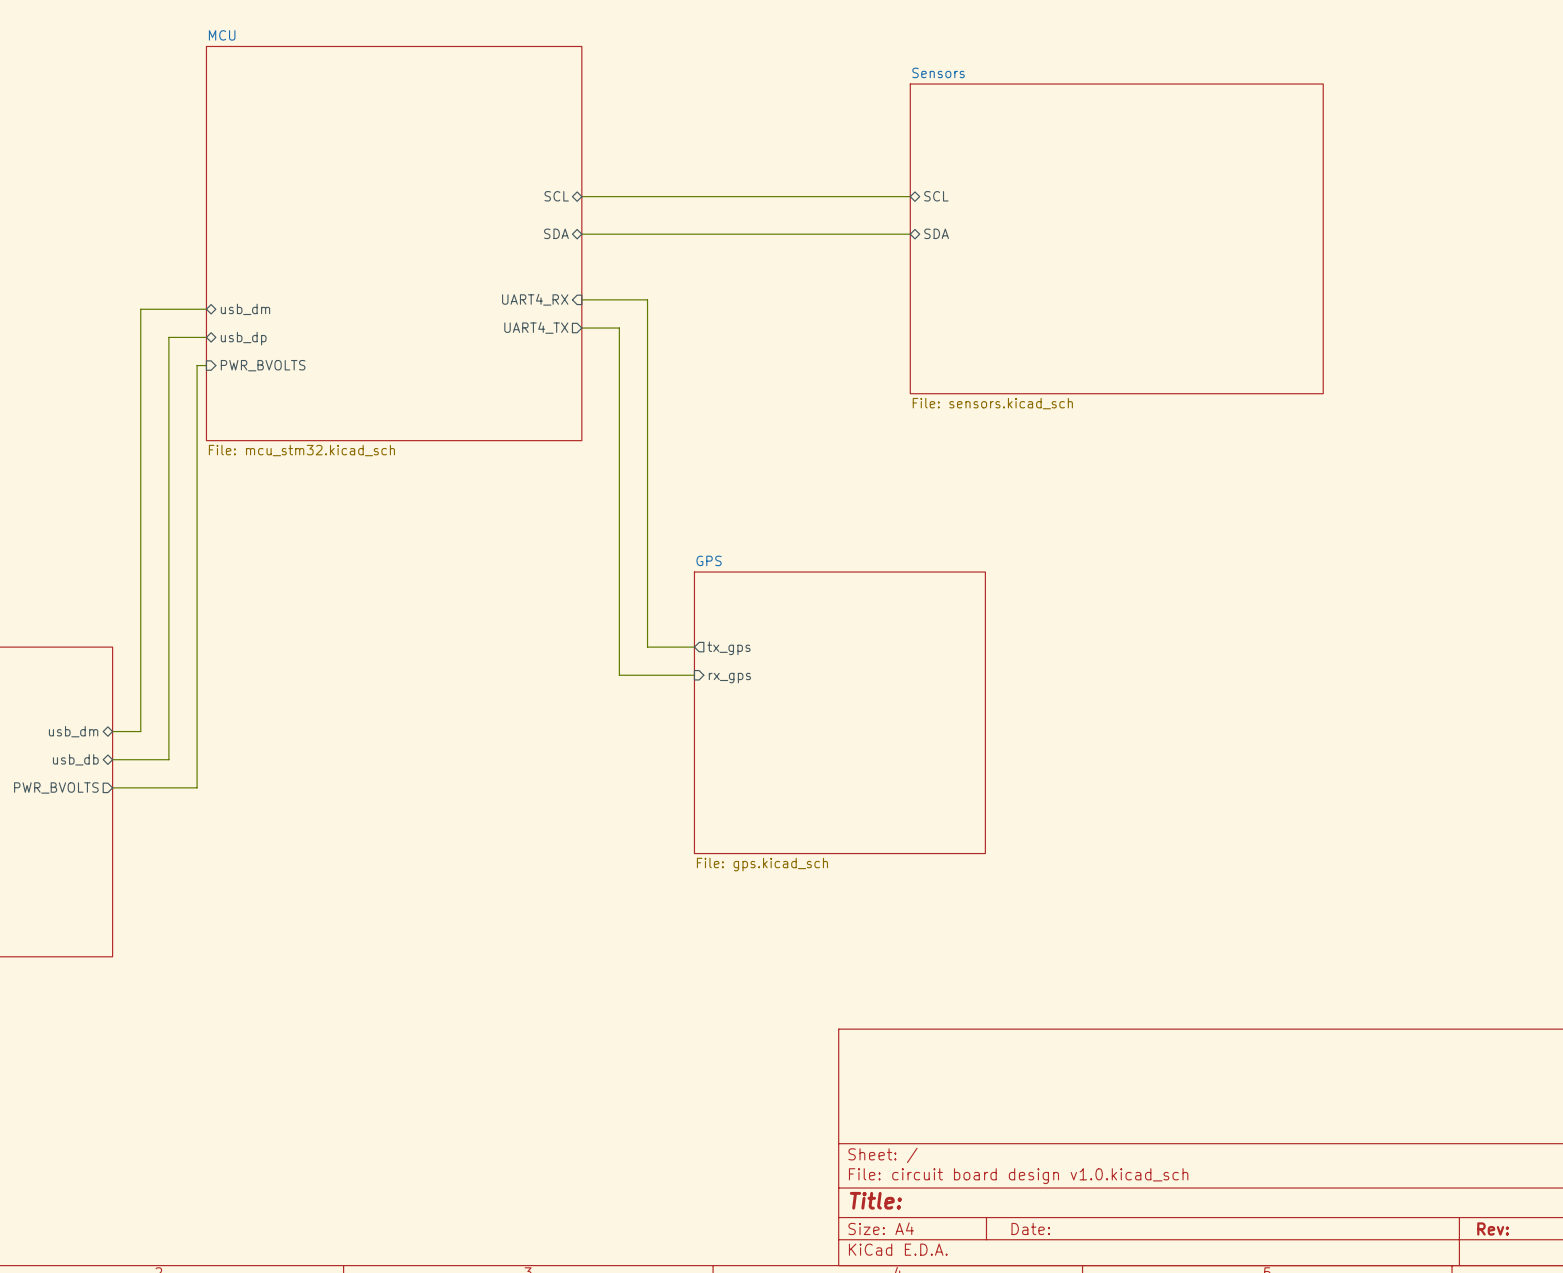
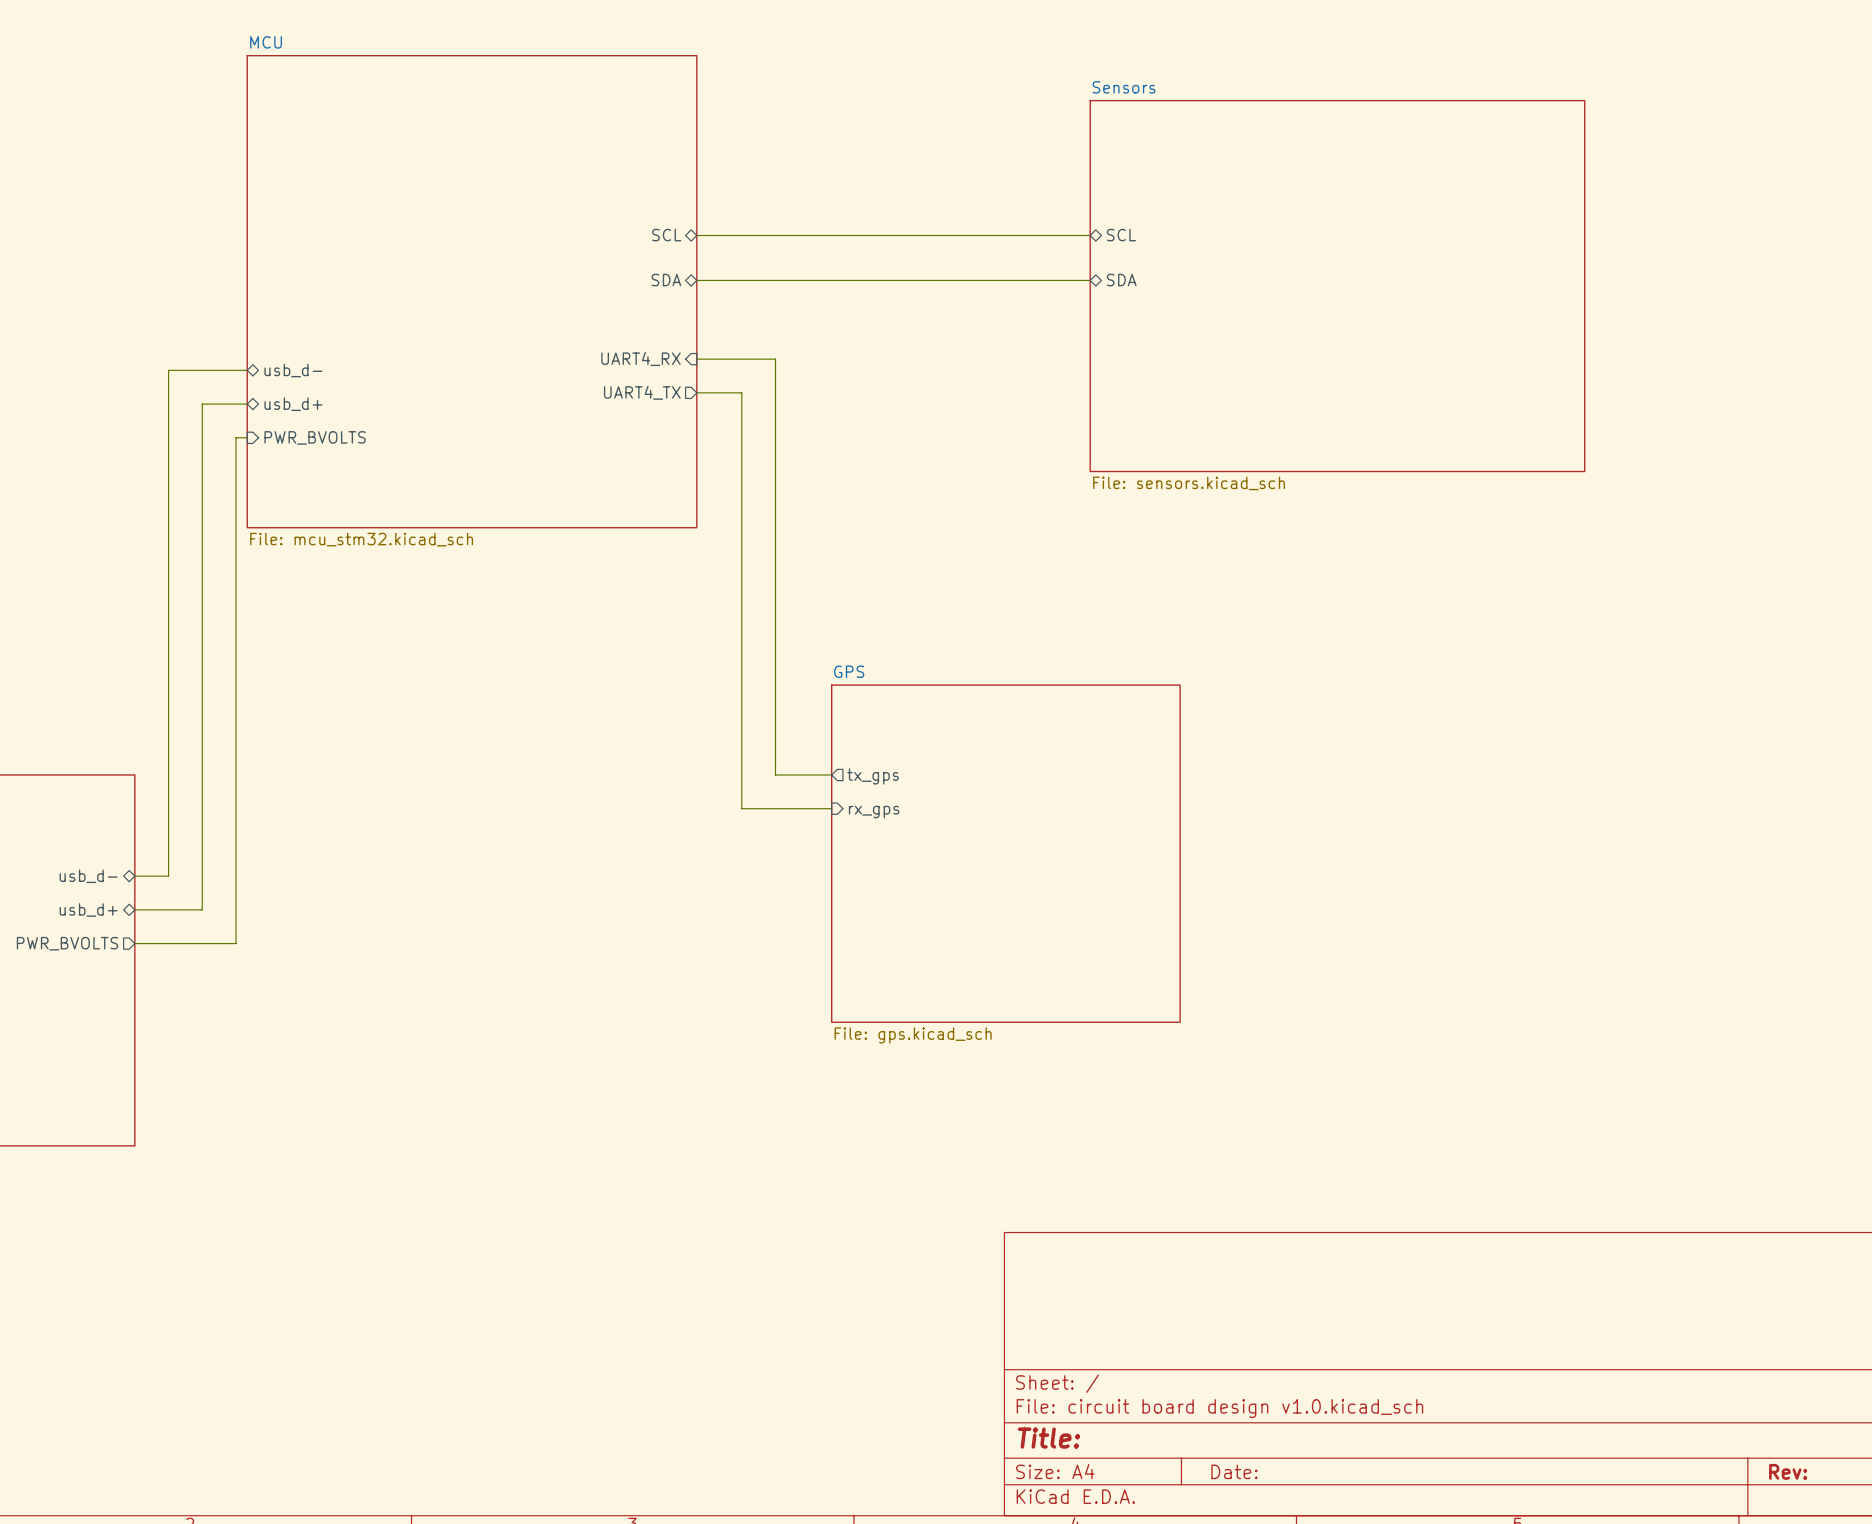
sheet pin: usb_dm (245, 309) -> usb_d- (293, 370)
sheet pin: usb_dp (243, 338) -> usb_d+ (293, 404)
sheet pin: usb_dm (73, 731) -> usb_d- (88, 876)
sheet pin: usb_db (75, 759) -> usb_d+ (88, 909)

